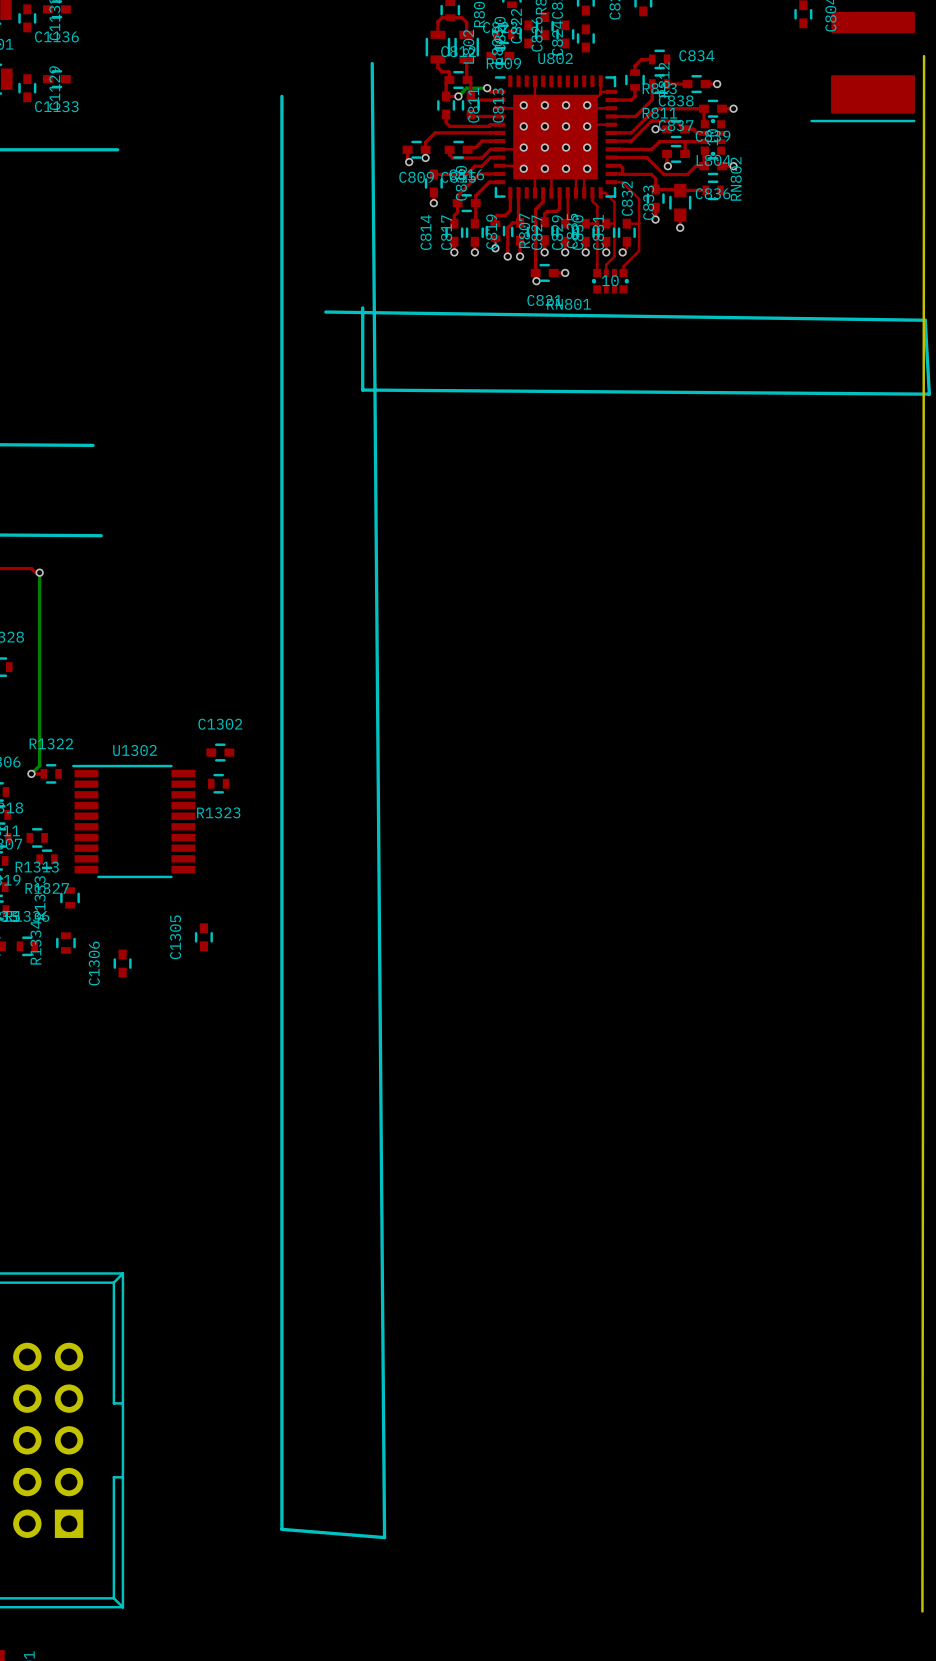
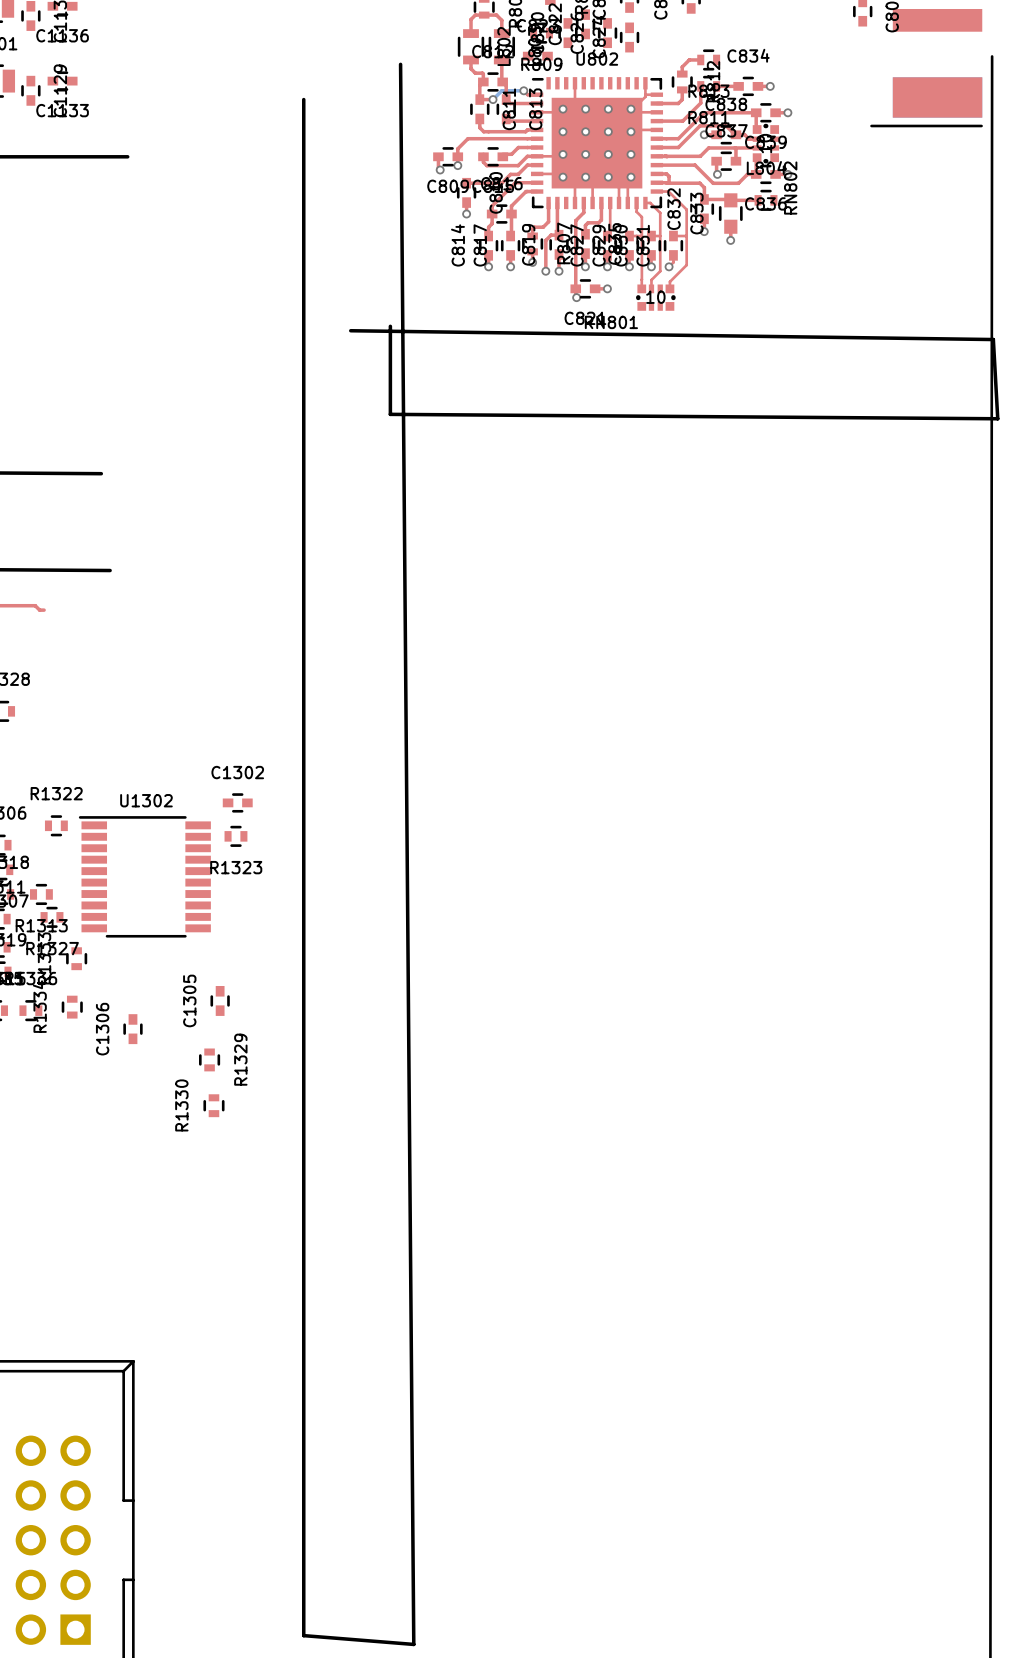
bottom track: (39, 572) (39, 765) (31, 773) -> none
via: (39, 572) -> none
top track: (31, 773) (43, 773) -> none
via: (31, 773) -> none
R1329: none -> (209, 1059)
R1330: none -> (213, 1105)

